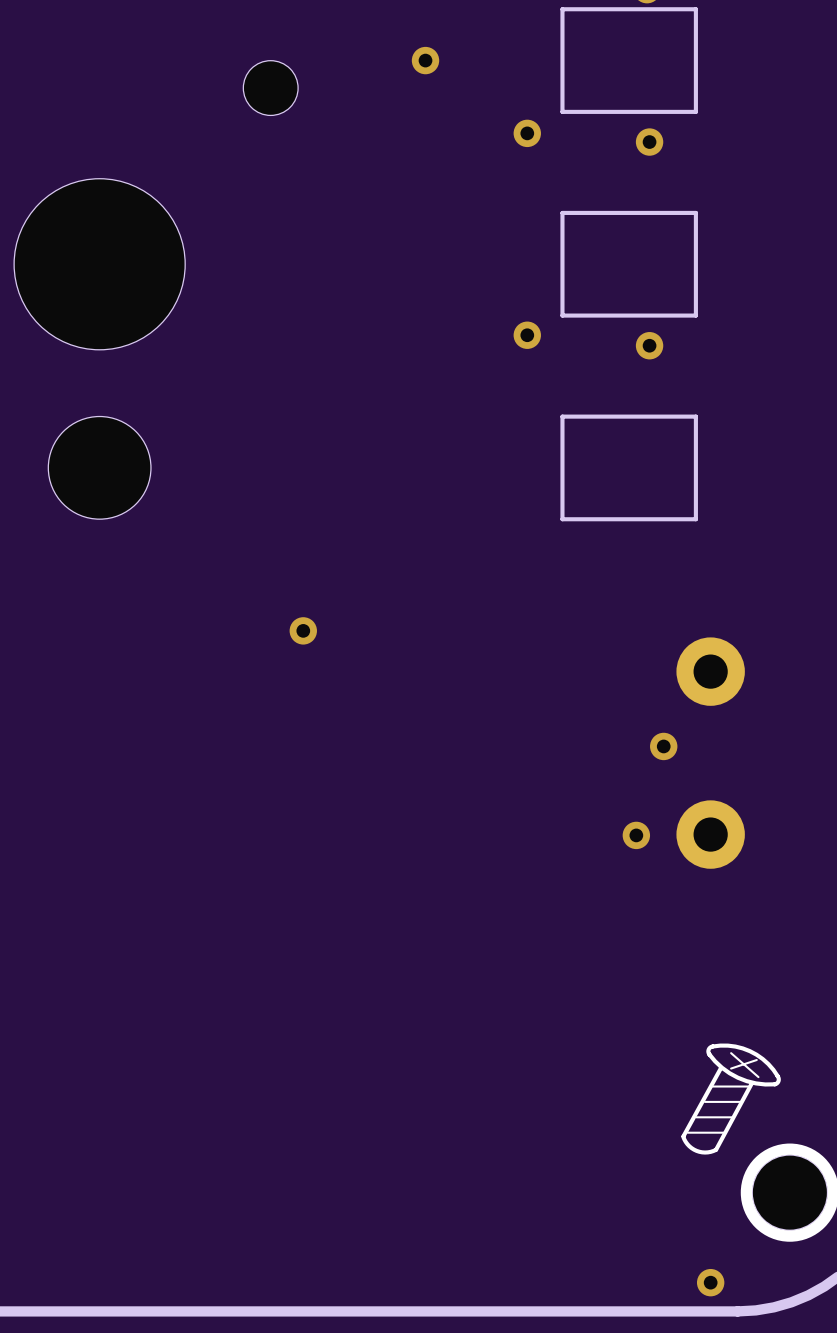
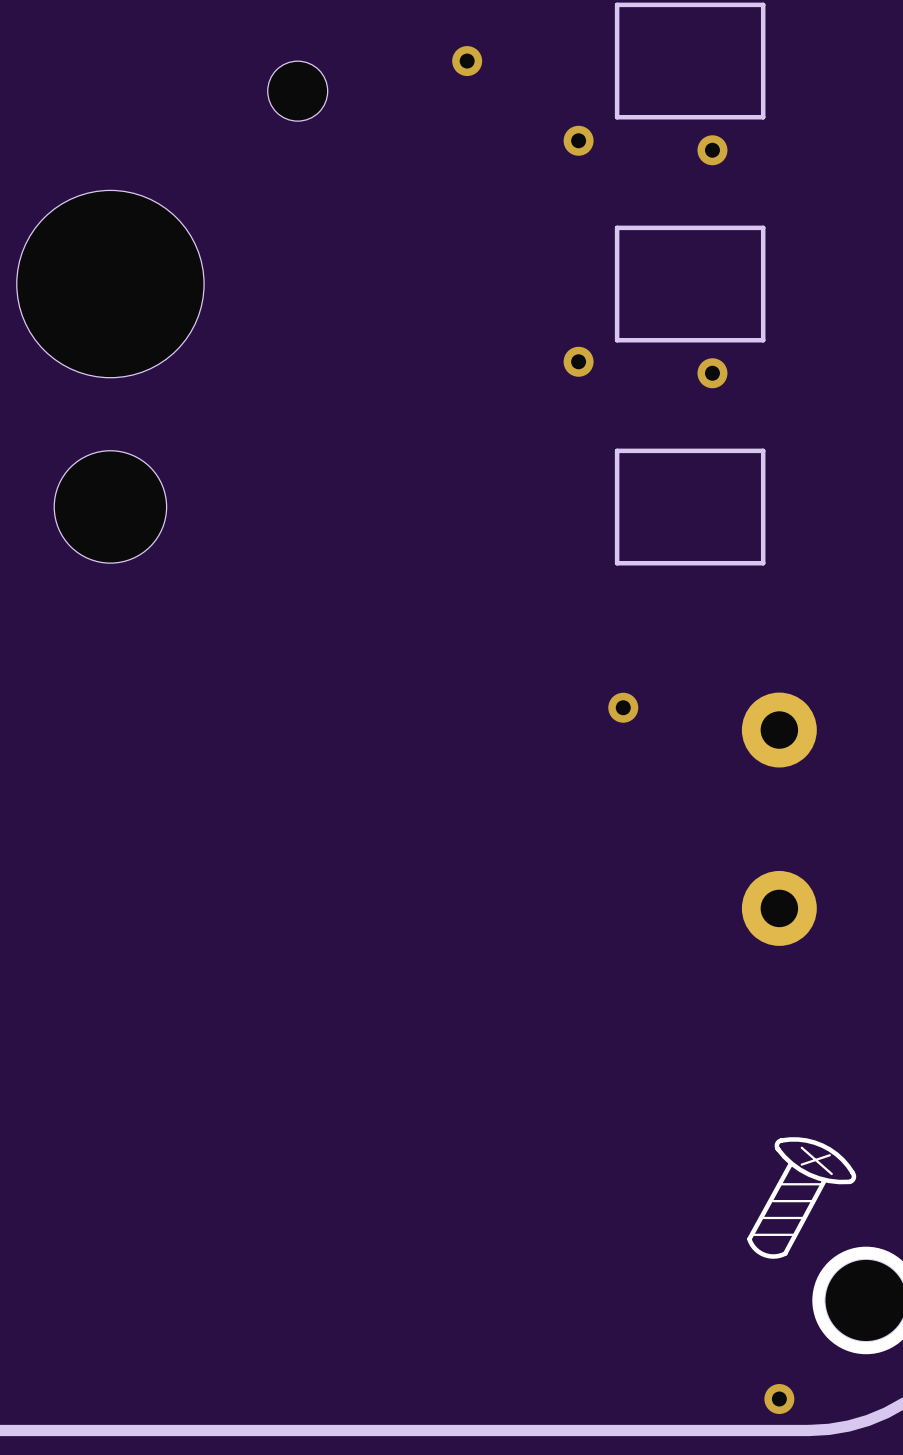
via: (303, 630) -> none
via: none -> (623, 707)
via: (663, 746) -> none
via: (636, 835) -> none

